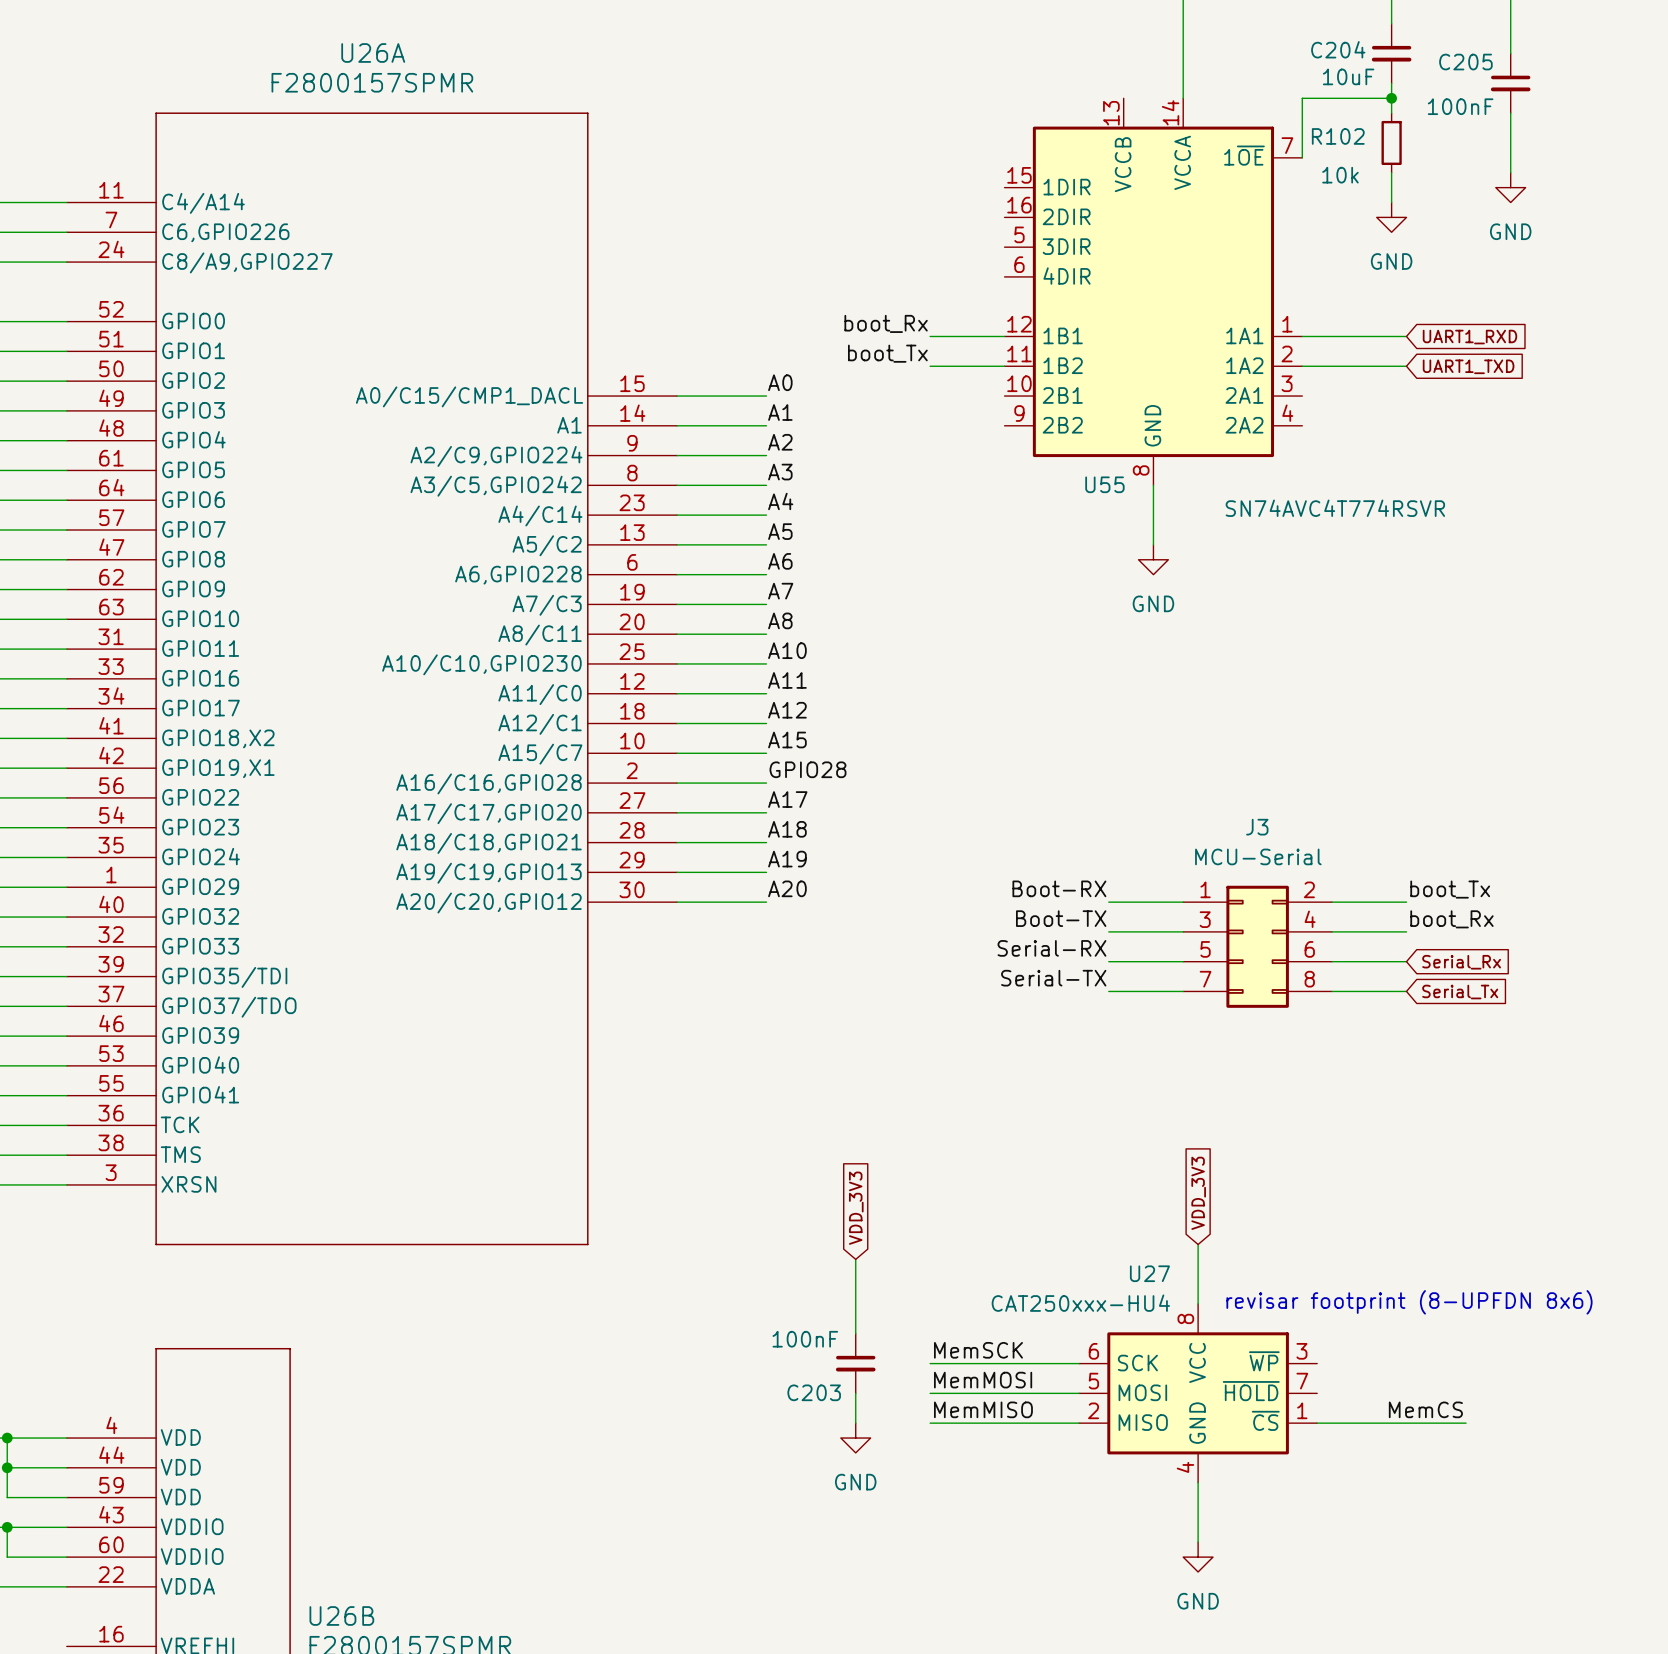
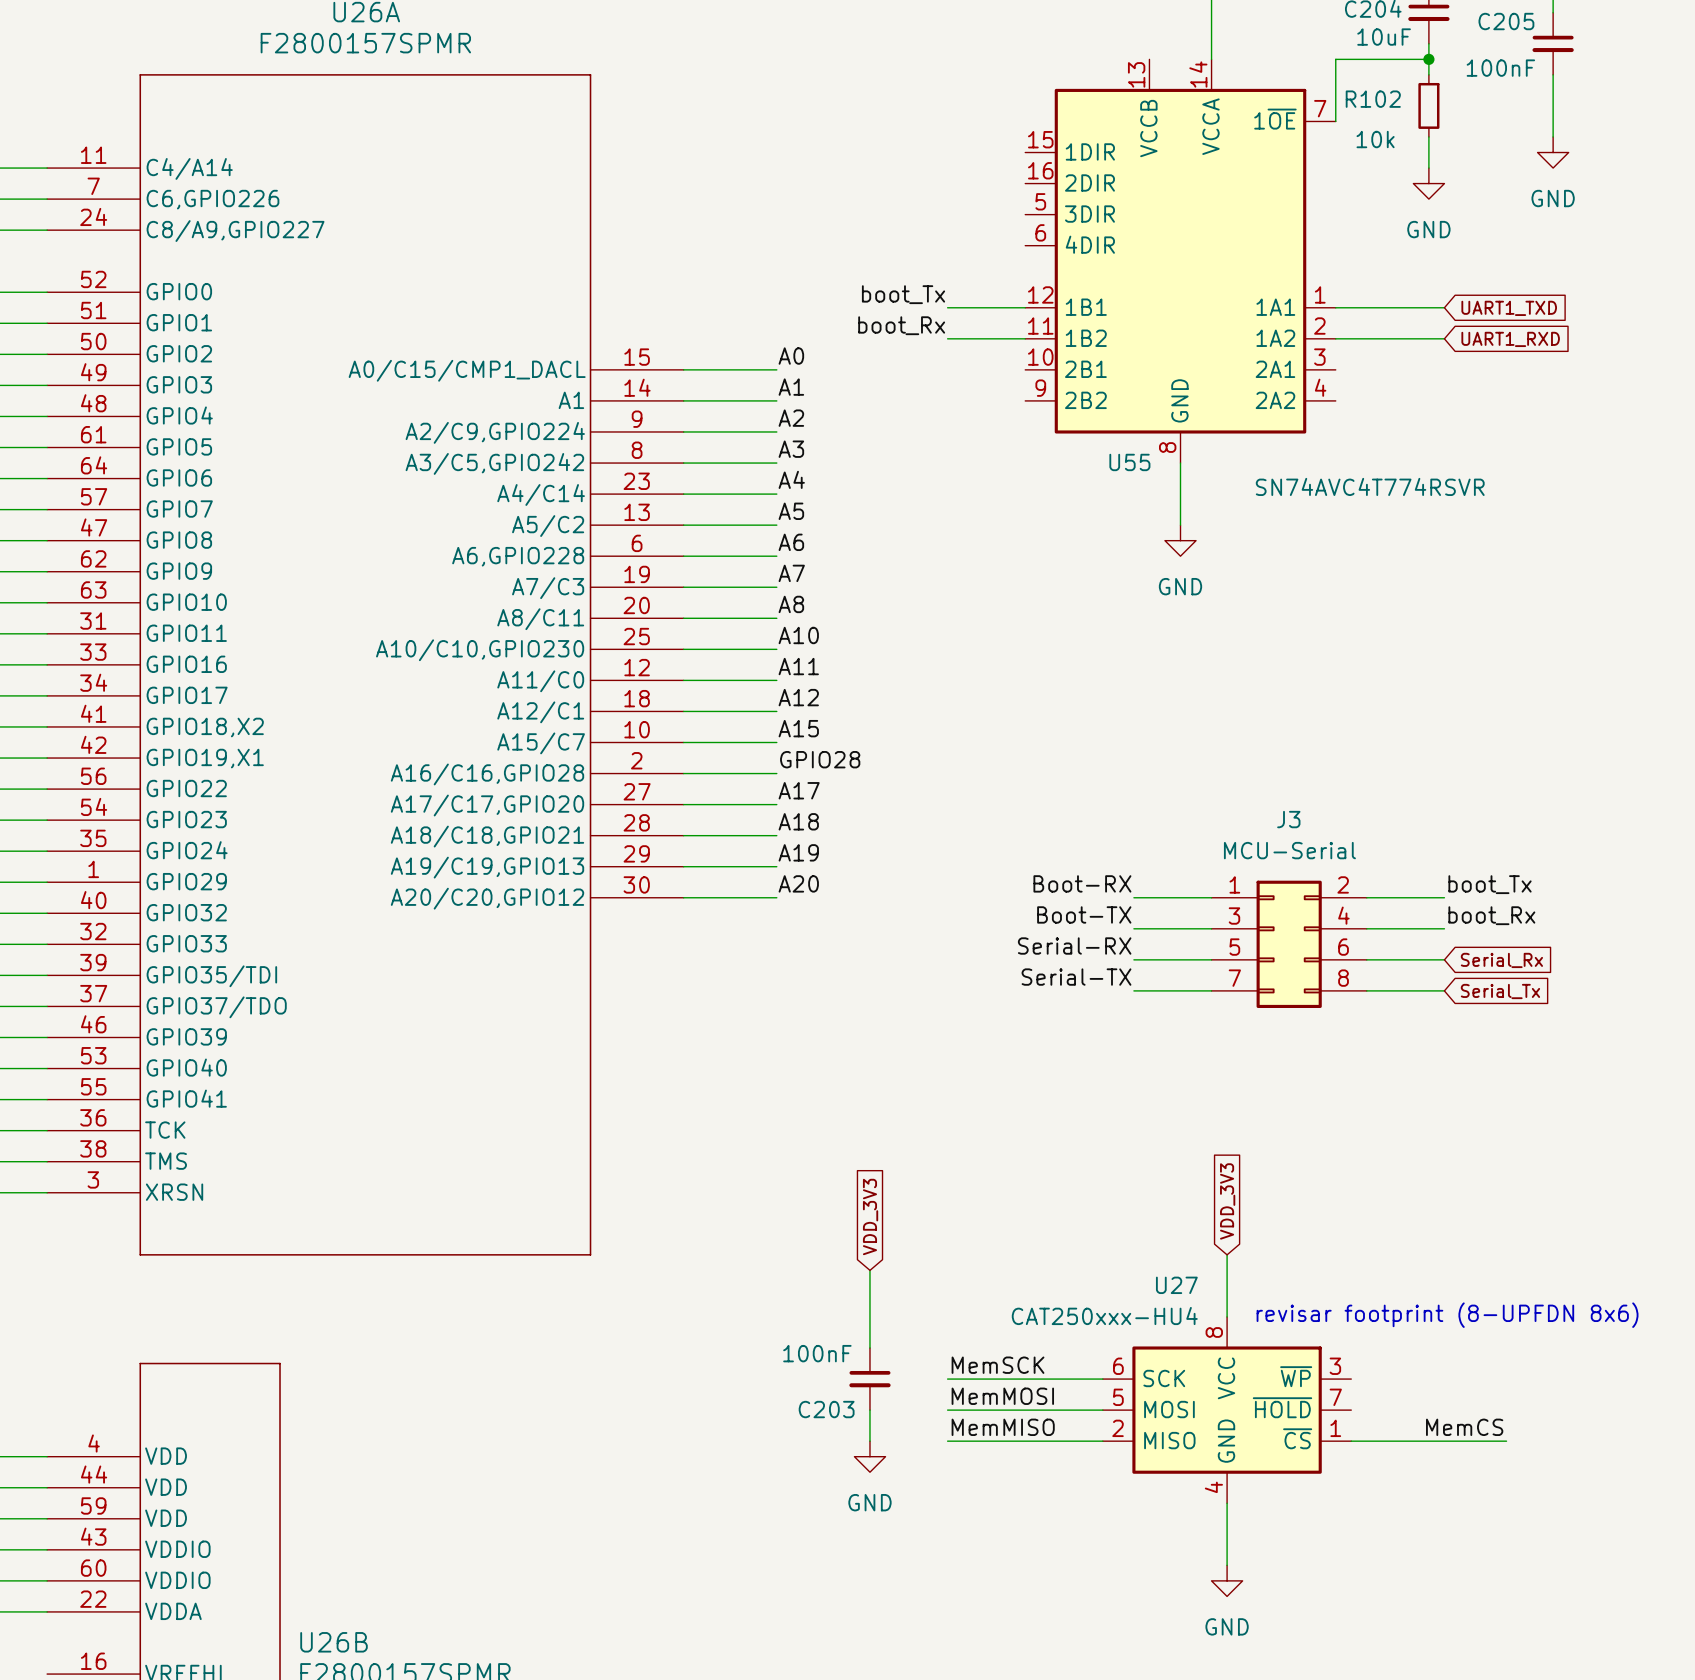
label: boot_Rx (886, 323) -> boot_Tx (903, 294)
global label: UART1_RXD (1469, 337) -> UART1_TXD (1509, 308)
label: boot_Tx (887, 353) -> boot_Rx (901, 325)
global label: UART1_TXD (1468, 366) -> UART1_RXD (1510, 339)

